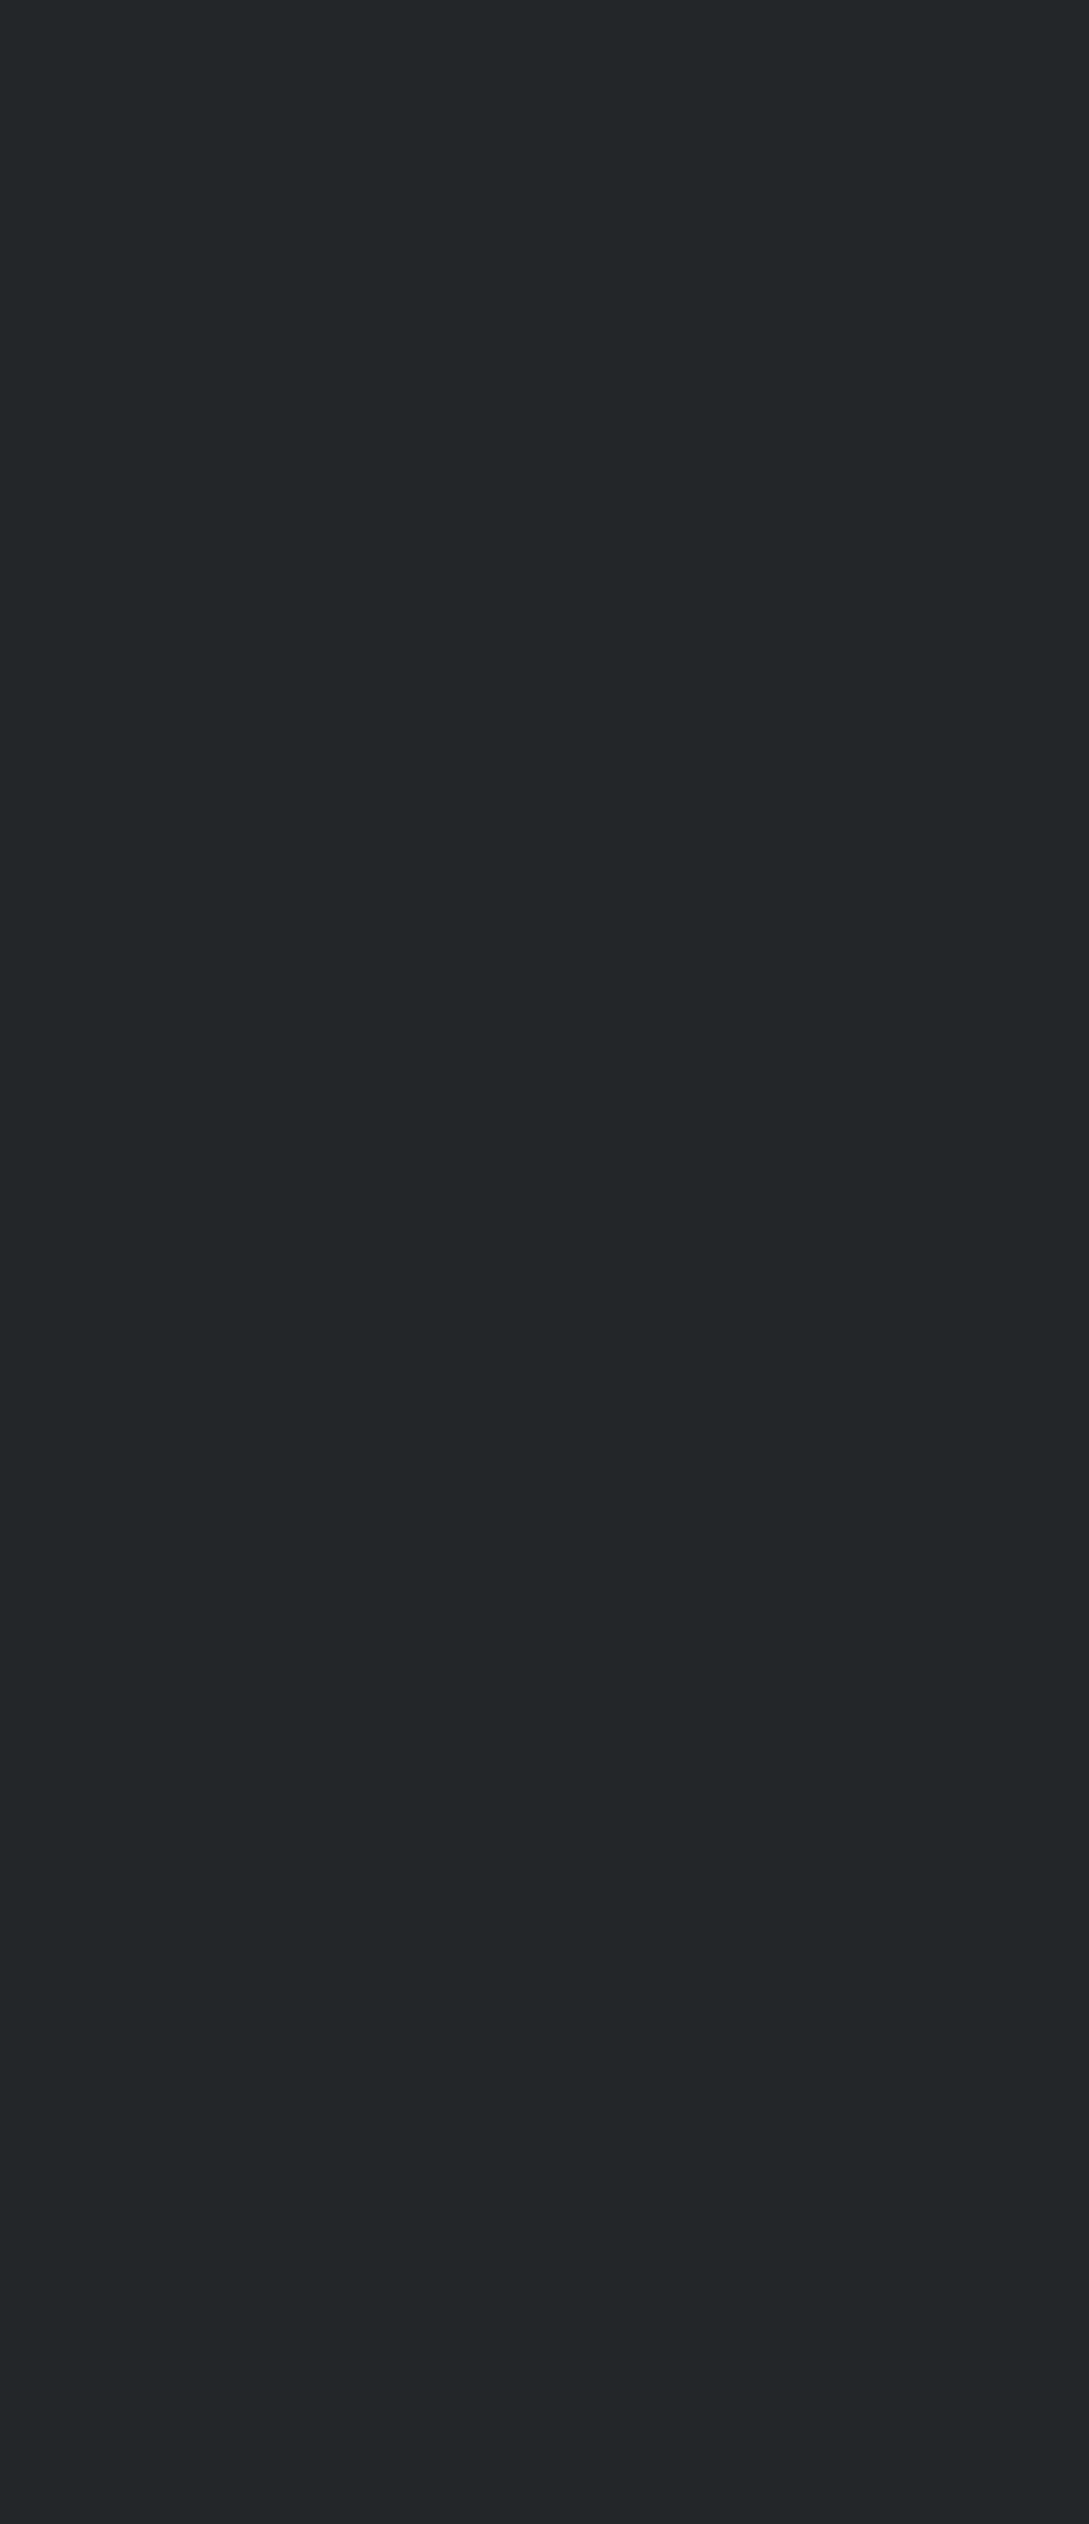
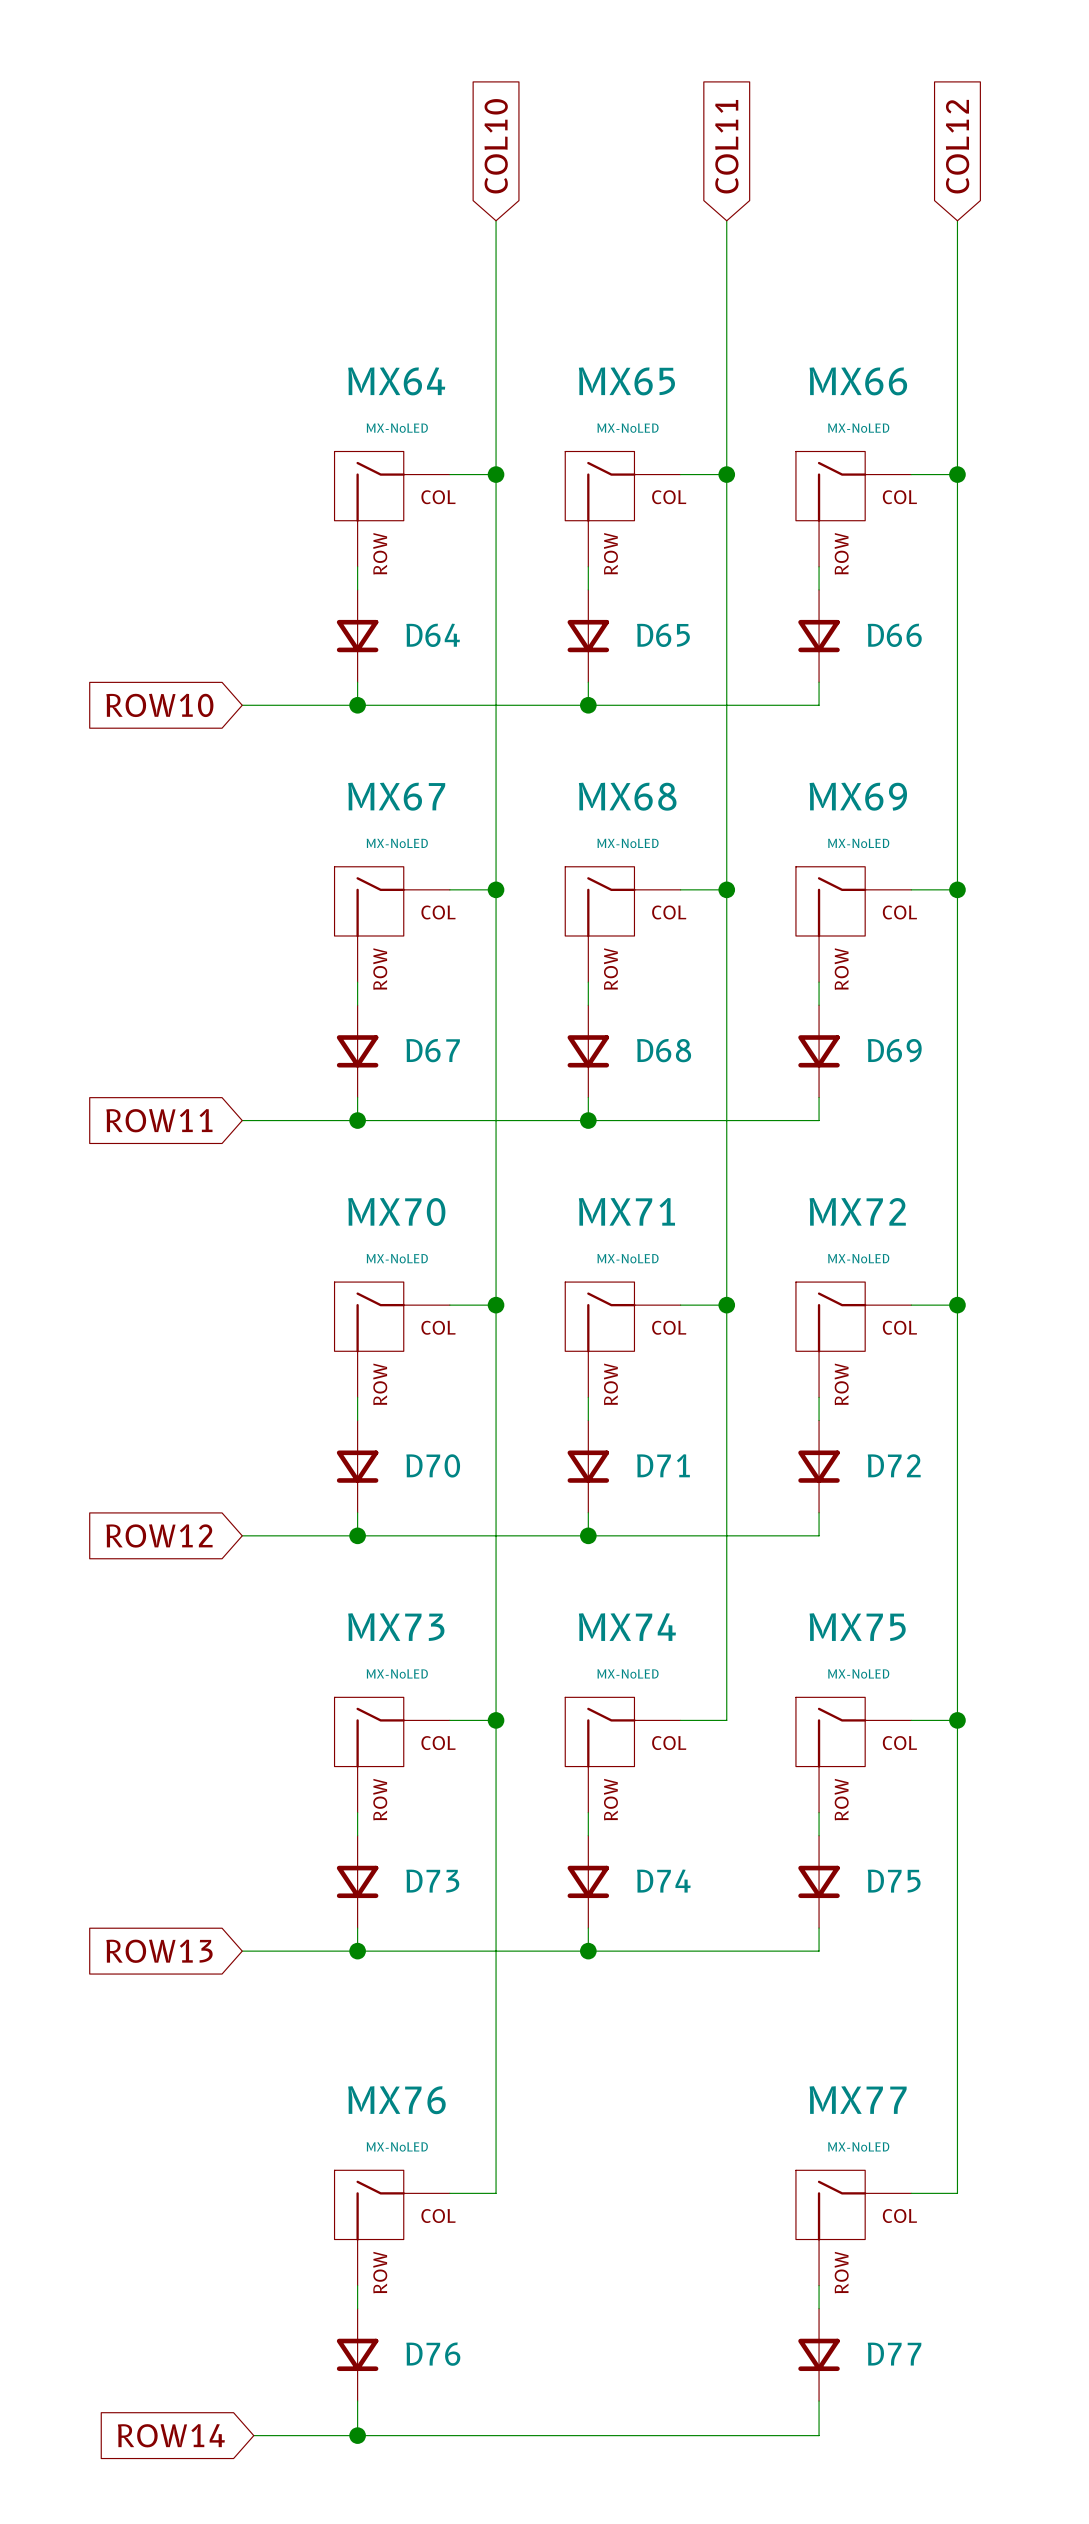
global label: none -> COL10 (496, 146)
global label: none -> COL11 (726, 146)
global label: none -> COL12 (957, 146)
wire: none -> (496, 220) (496, 1305)
wire: none -> (726, 220) (726, 1720) (680, 1720)
wire: none -> (957, 220) (957, 2193) (911, 2193)
wire: none -> (449, 474) (496, 474)
junction: none -> (496, 474)
wire: none -> (680, 474) (726, 474)
junction: none -> (726, 474)
wire: none -> (911, 474) (957, 474)
junction: none -> (957, 474)
MX64: none -> MX-NoLED (392, 509)
MX65: none -> MX-NoLED (622, 509)
MX66: none -> MX-NoLED (853, 509)
wire: none -> (357, 566) (357, 589)
wire: none -> (588, 566) (588, 589)
wire: none -> (819, 566) (819, 589)
D64: none -> (357, 636)
D65: none -> (588, 636)
D66: none -> (819, 636)
wire: none -> (357, 682) (357, 705)
wire: none -> (588, 682) (588, 705)
wire: none -> (819, 682) (819, 705) (242, 705)
global label: none -> ROW10 (159, 705)
junction: none -> (357, 705)
junction: none -> (588, 705)
wire: none -> (449, 889) (496, 889)
junction: none -> (496, 889)
wire: none -> (680, 889) (726, 889)
junction: none -> (726, 889)
wire: none -> (911, 889) (957, 889)
junction: none -> (957, 889)
MX67: none -> MX-NoLED (392, 924)
MX68: none -> MX-NoLED (622, 924)
MX69: none -> MX-NoLED (853, 924)
wire: none -> (357, 982) (357, 1005)
wire: none -> (588, 982) (588, 1005)
wire: none -> (819, 982) (819, 1005)
D67: none -> (357, 1051)
D68: none -> (588, 1051)
D69: none -> (819, 1051)
wire: none -> (357, 1097) (357, 1120)
wire: none -> (588, 1097) (588, 1120)
wire: none -> (819, 1097) (819, 1120) (242, 1120)
global label: none -> ROW11 (159, 1120)
junction: none -> (357, 1120)
junction: none -> (588, 1120)
wire: none -> (449, 1305) (496, 1305)
wire: none -> (496, 1305) (496, 2193) (449, 2193)
junction: none -> (496, 1305)
wire: none -> (680, 1305) (726, 1305)
junction: none -> (726, 1305)
wire: none -> (911, 1305) (957, 1305)
junction: none -> (957, 1305)
MX70: none -> MX-NoLED (392, 1339)
MX71: none -> MX-NoLED (622, 1339)
MX72: none -> MX-NoLED (853, 1339)
wire: none -> (357, 1397) (357, 1420)
wire: none -> (588, 1397) (588, 1420)
wire: none -> (819, 1397) (819, 1420)
D70: none -> (357, 1466)
D71: none -> (588, 1466)
D72: none -> (819, 1466)
wire: none -> (357, 1512) (357, 1535)
wire: none -> (588, 1512) (588, 1535)
wire: none -> (819, 1512) (819, 1535) (242, 1535)
global label: none -> ROW12 (159, 1535)
junction: none -> (357, 1535)
junction: none -> (588, 1535)
wire: none -> (449, 1720) (496, 1720)
junction: none -> (496, 1720)
wire: none -> (911, 1720) (957, 1720)
junction: none -> (957, 1720)
MX73: none -> MX-NoLED (392, 1755)
MX74: none -> MX-NoLED (622, 1755)
MX75: none -> MX-NoLED (853, 1755)
wire: none -> (357, 1812) (357, 1835)
wire: none -> (588, 1812) (588, 1835)
wire: none -> (819, 1812) (819, 1835)
D73: none -> (357, 1881)
D74: none -> (588, 1881)
D75: none -> (819, 1881)
wire: none -> (357, 1928) (357, 1951)
wire: none -> (588, 1928) (588, 1951)
wire: none -> (819, 1928) (819, 1951) (242, 1951)
global label: none -> ROW13 (159, 1951)
junction: none -> (357, 1951)
junction: none -> (588, 1951)
MX76: none -> MX-NoLED (392, 2227)
MX77: none -> MX-NoLED (853, 2227)
wire: none -> (357, 2285) (357, 2308)
wire: none -> (819, 2285) (819, 2308)
D76: none -> (357, 2354)
D77: none -> (819, 2354)
wire: none -> (357, 2401) (357, 2435)
wire: none -> (819, 2401) (819, 2435) (253, 2435)
global label: none -> ROW14 (171, 2435)
junction: none -> (357, 2435)

